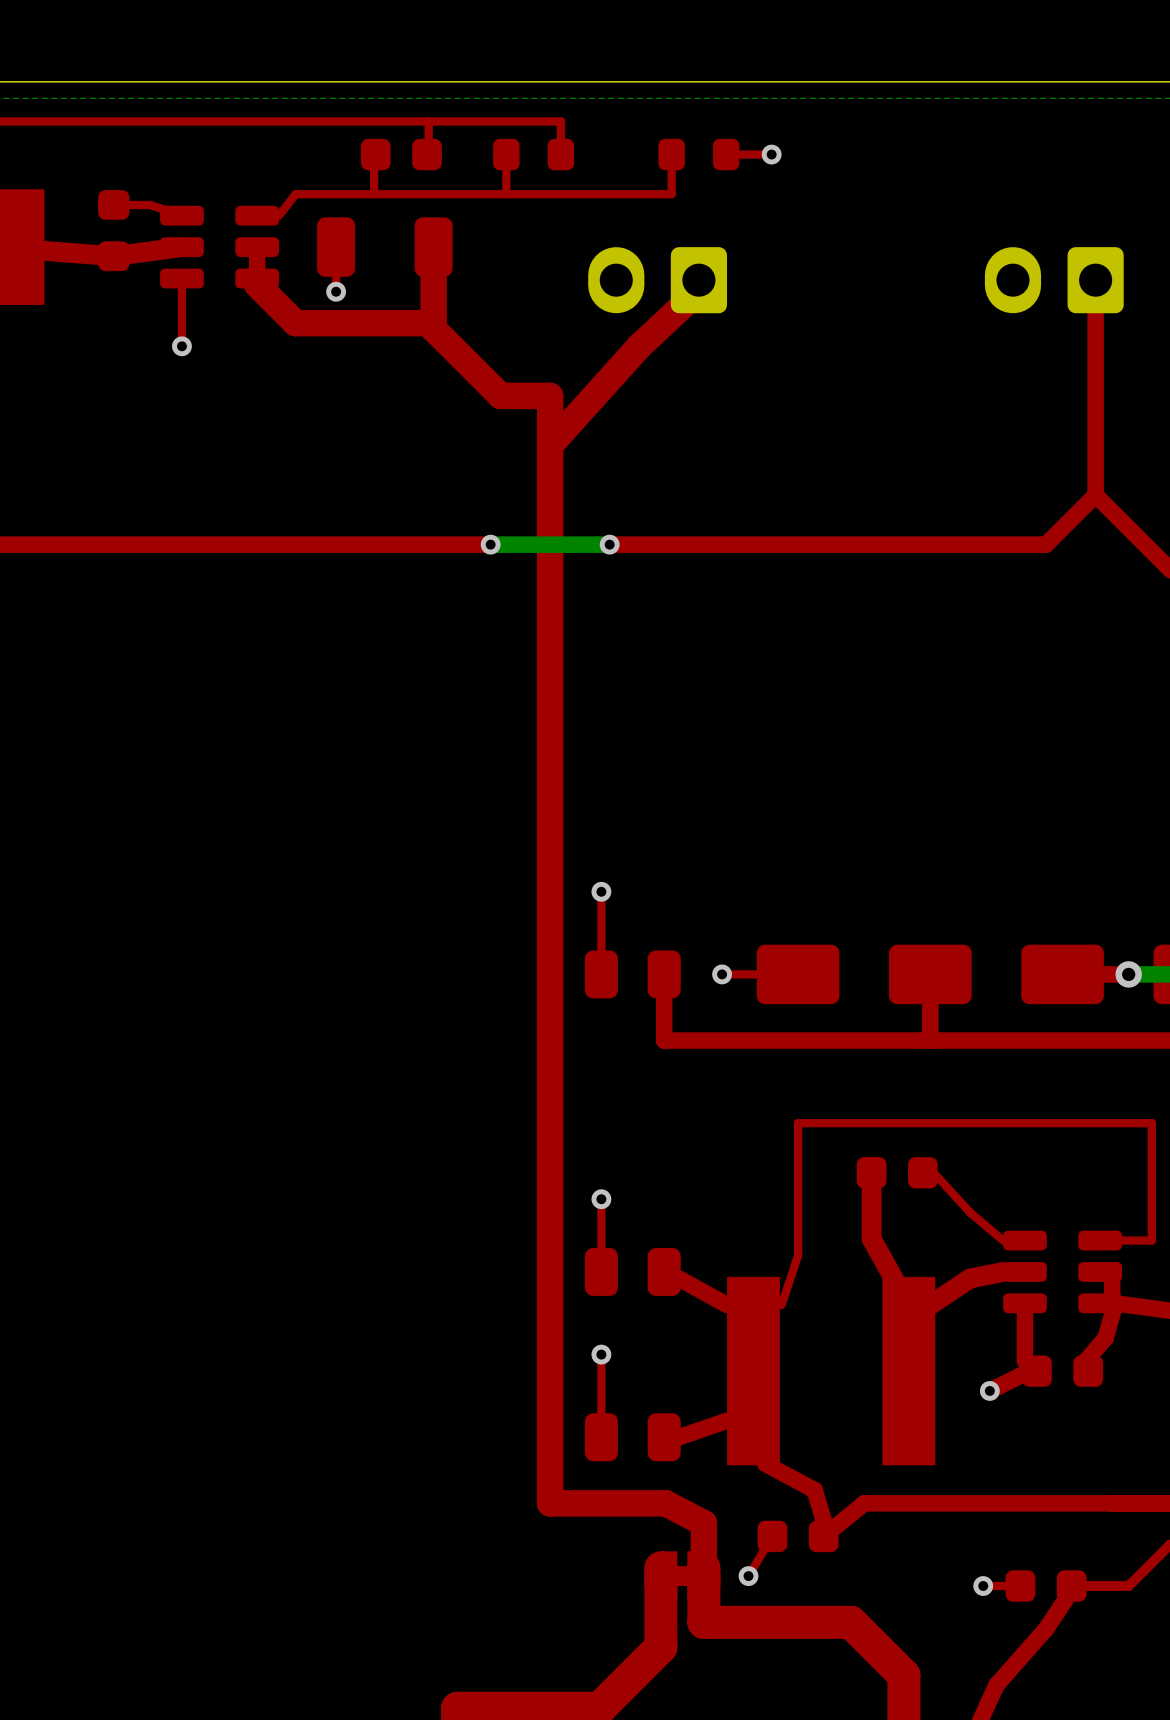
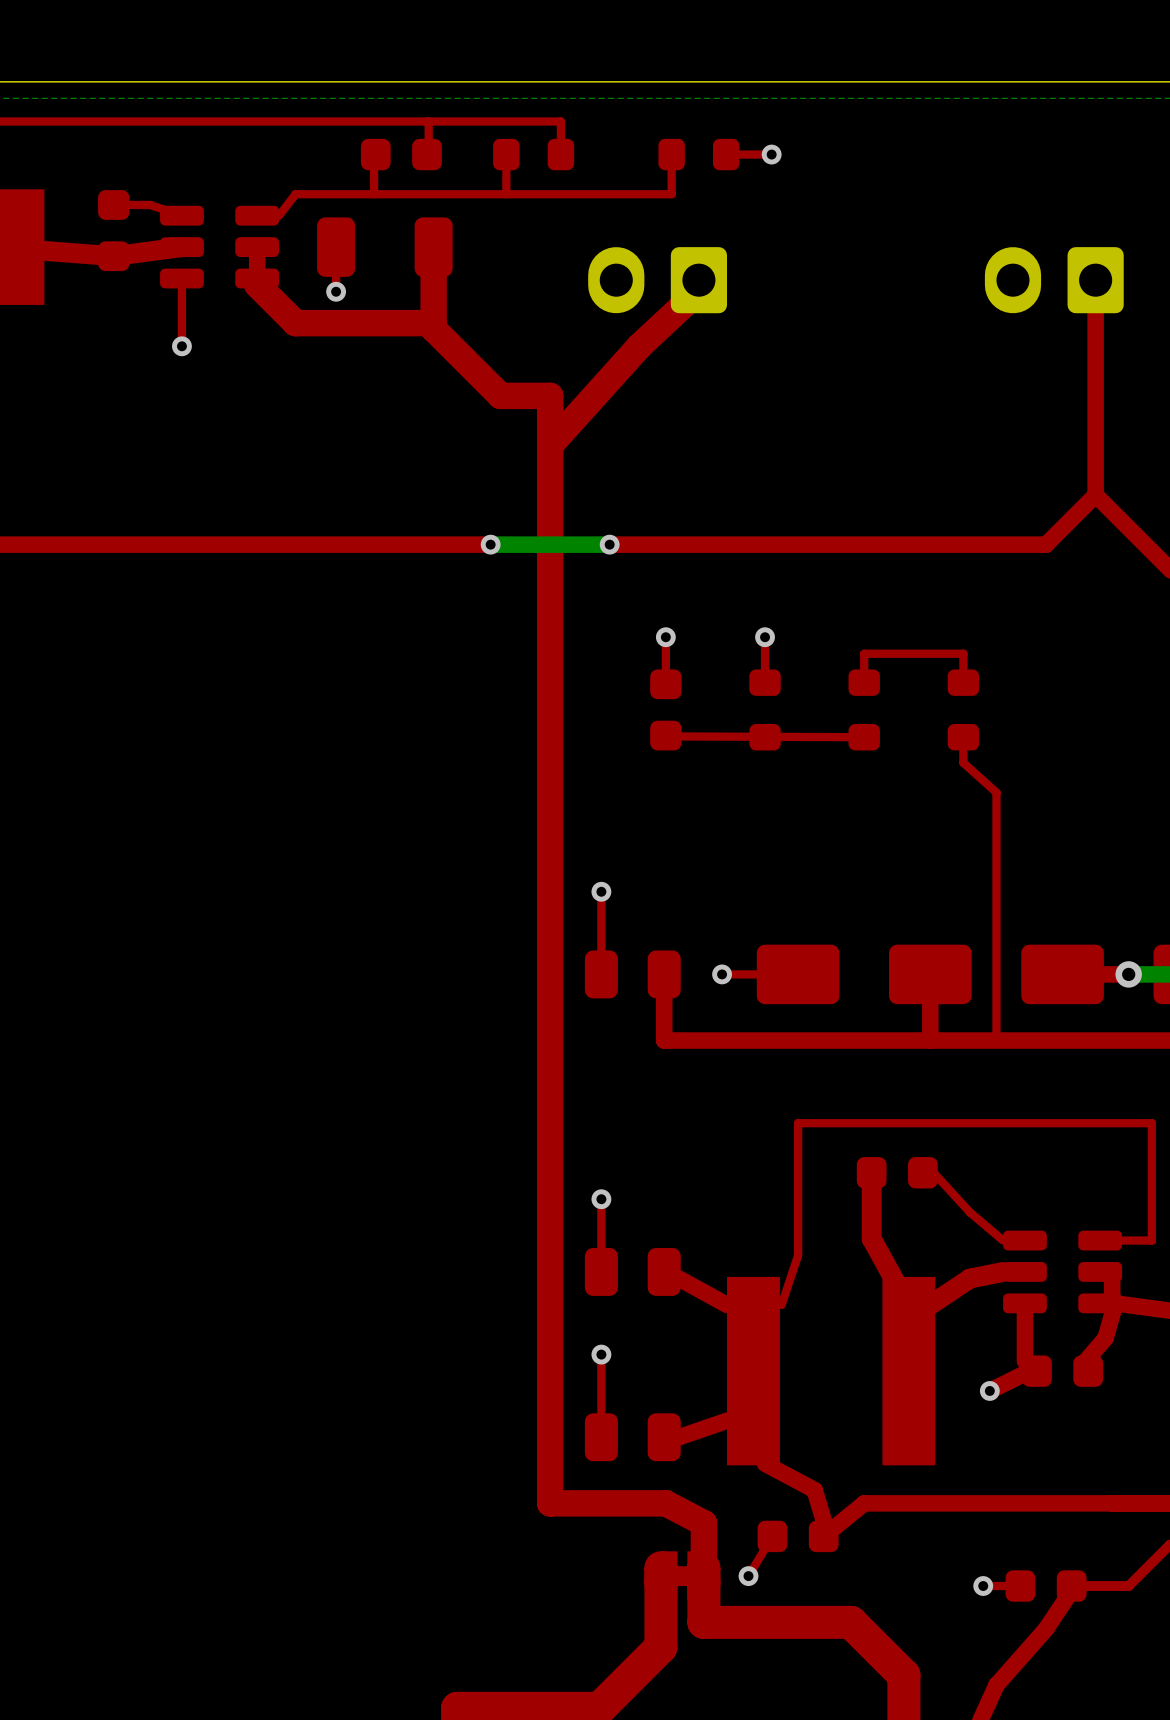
top track: none -> (665, 637) (665, 684)
via: none -> (665, 637)
top track: none -> (765, 637) (765, 682)
via: none -> (765, 637)
top track: none -> (963, 682) (963, 653) (864, 653) (864, 682)
part: none -> (665, 709)
part: none -> (765, 709)
part: none -> (864, 709)
part: none -> (963, 709)
top track: none -> (665, 736) (864, 737)
top track: none -> (963, 749) (963, 762) (996, 792) (996, 1040)

